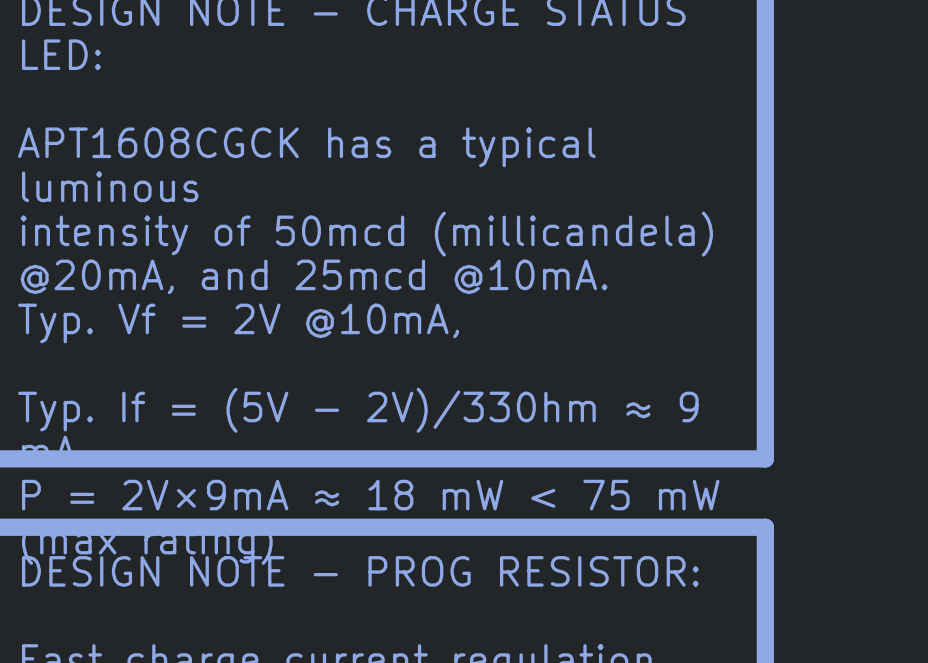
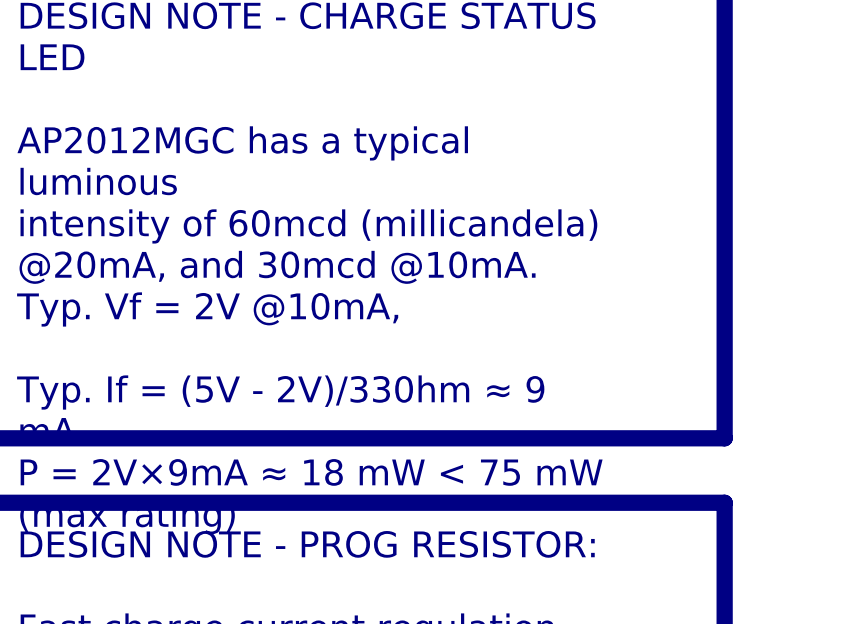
text: LED: (61, 54) -> LED (52, 57)
text: APT1608CGCK has a typical (306, 147) -> AP2012MGC has a typical (242, 143)
text: intensity of 50mcd (millicandela) (366, 234) -> intensity of 60mcd (millicandela) (308, 226)
text: @20mA, and 25mcd @10mA. (314, 276) -> @20mA, and 30mcd @10mA. (277, 267)

